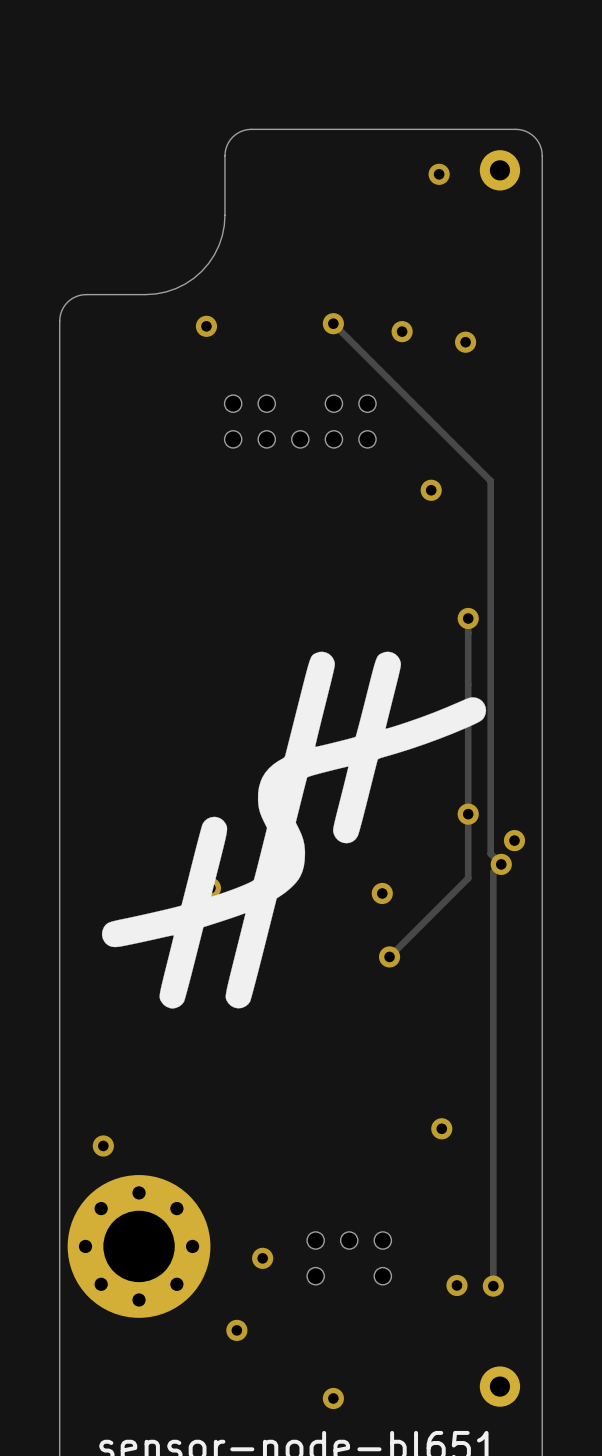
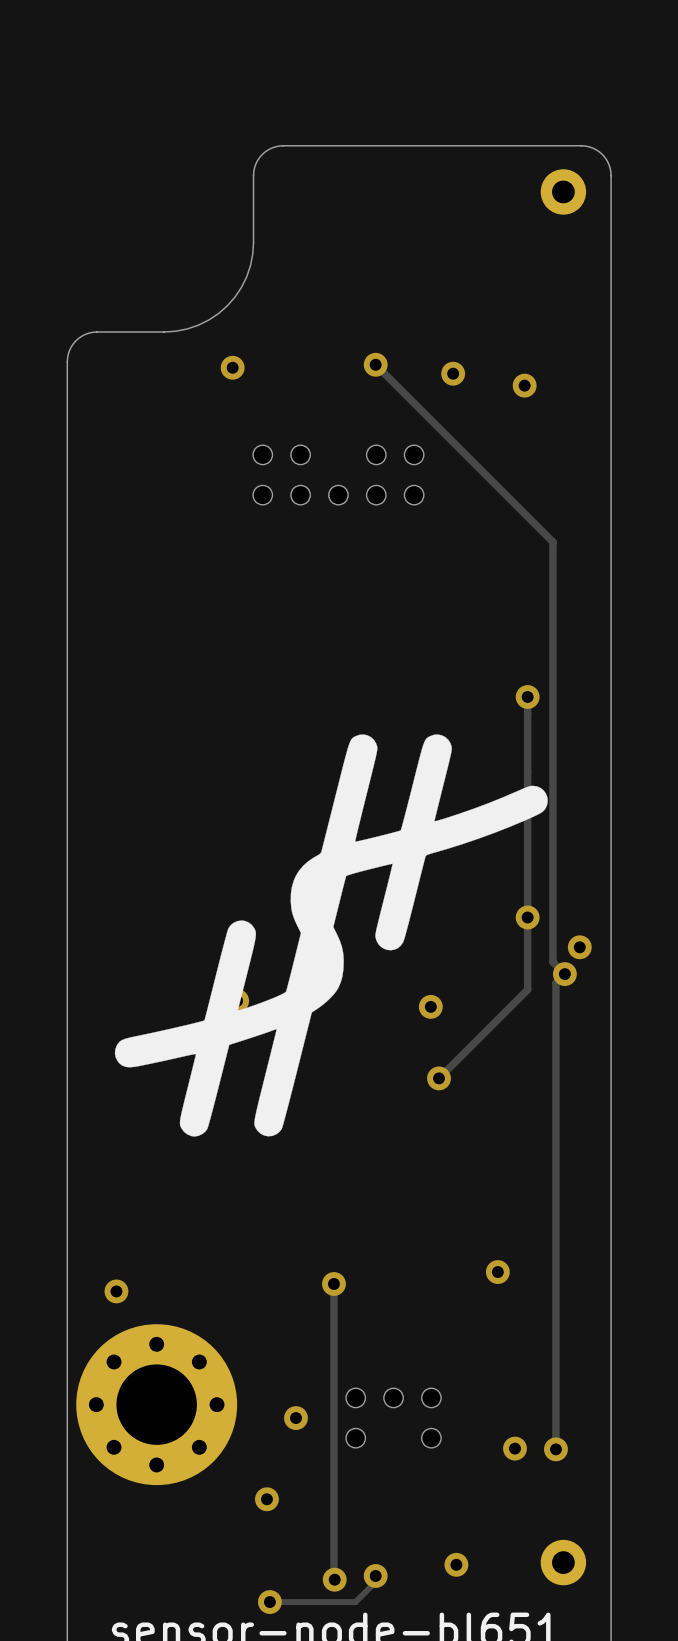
via: (439, 174) -> none
via: (431, 490) -> none
track: none -> (333, 1283) (334, 1579)
via: none -> (333, 1283)
via: none -> (456, 1564)
via: none -> (334, 1579)
track: none -> (376, 1581) (355, 1602) (269, 1602)
via: none -> (269, 1602)

